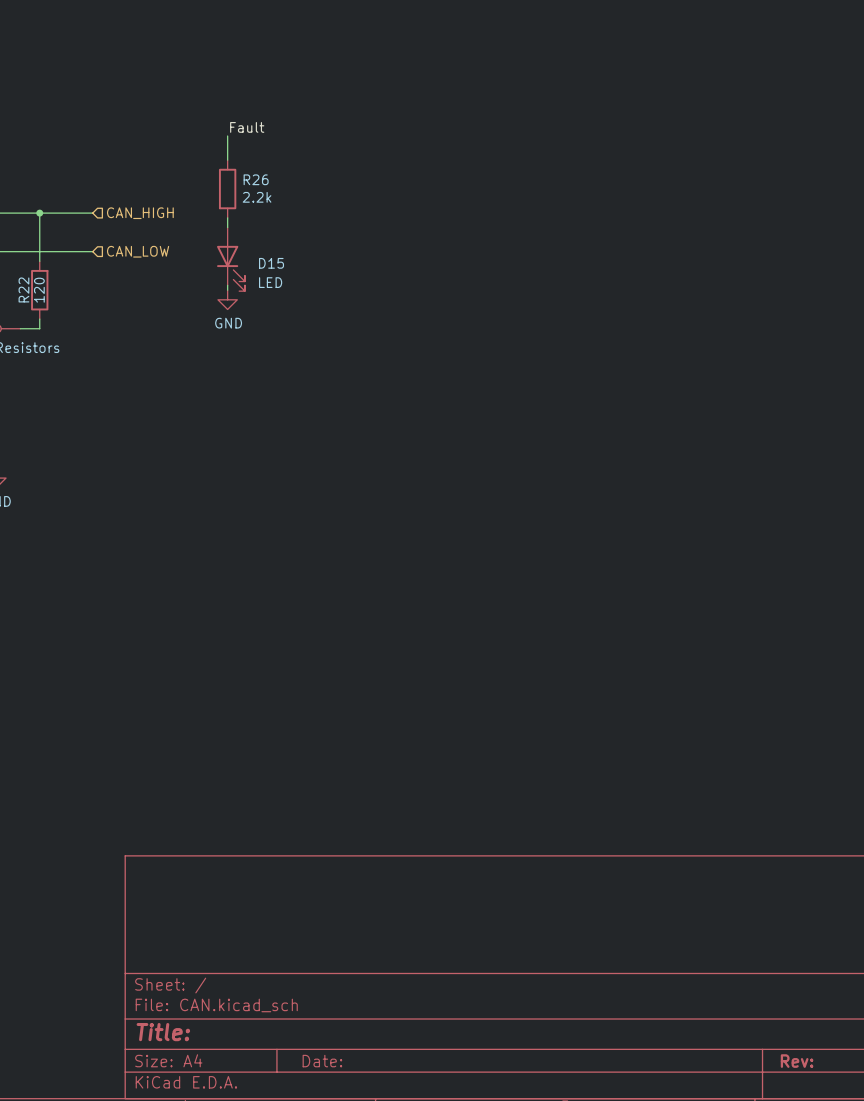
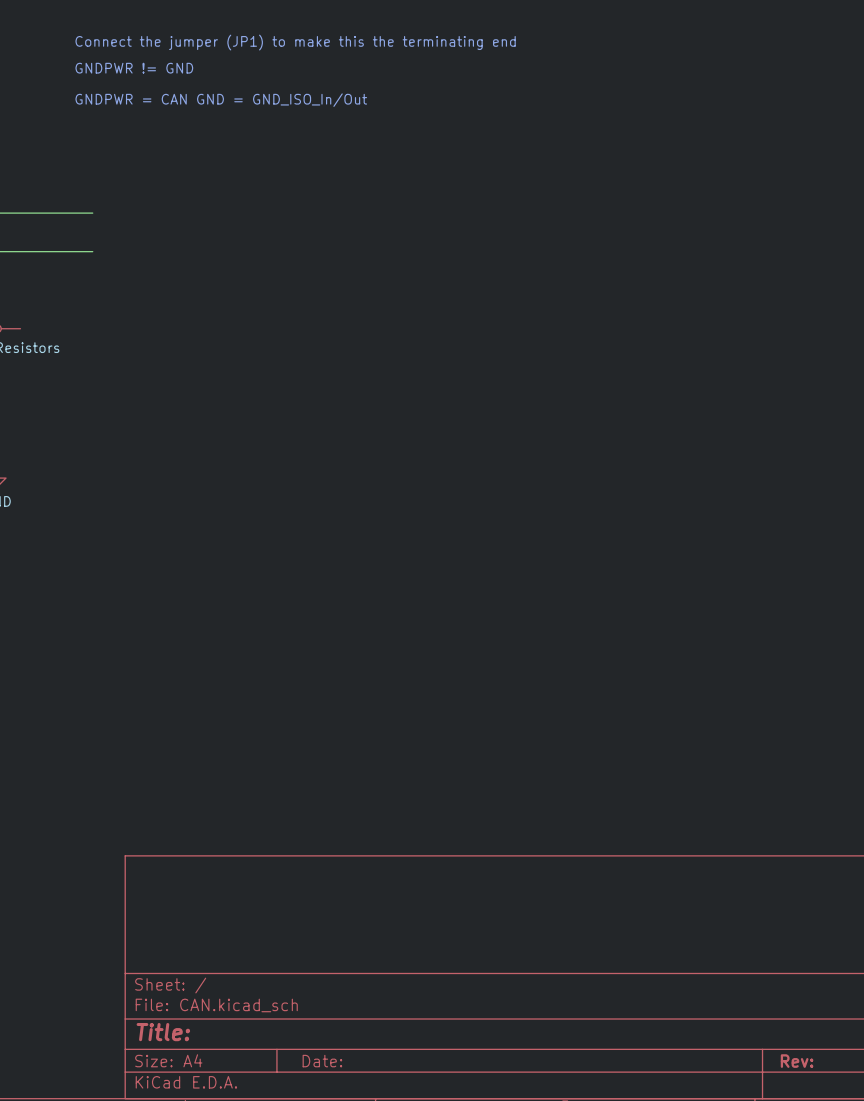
text: none -> Connect the jumper (JP1) to make this the terminating end (295, 42)
text: none -> GNDPWR != GND (134, 68)
text: none -> GNDPWR = CAN GND = GND_ISO_In/Out (221, 100)
label: Fault (247, 127) -> none
wire: (227, 136) (227, 160) -> none
R26: 2.2k (227, 189) -> none
wire: (39, 213) (39, 261) -> none
junction: (39, 213) -> none
hierarchical label: CAN_HIGH (140, 213) -> none
wire: (227, 217) (227, 227) -> none
hierarchical label: CAN_LOW (138, 251) -> none
D15: LED (231, 259) -> none
wire: (227, 285) (227, 290) -> none
R22: 120 (39, 290) -> none
power symbol: GND (227, 299) -> none
wire: (39, 319) (39, 328) (20, 328) -> none

